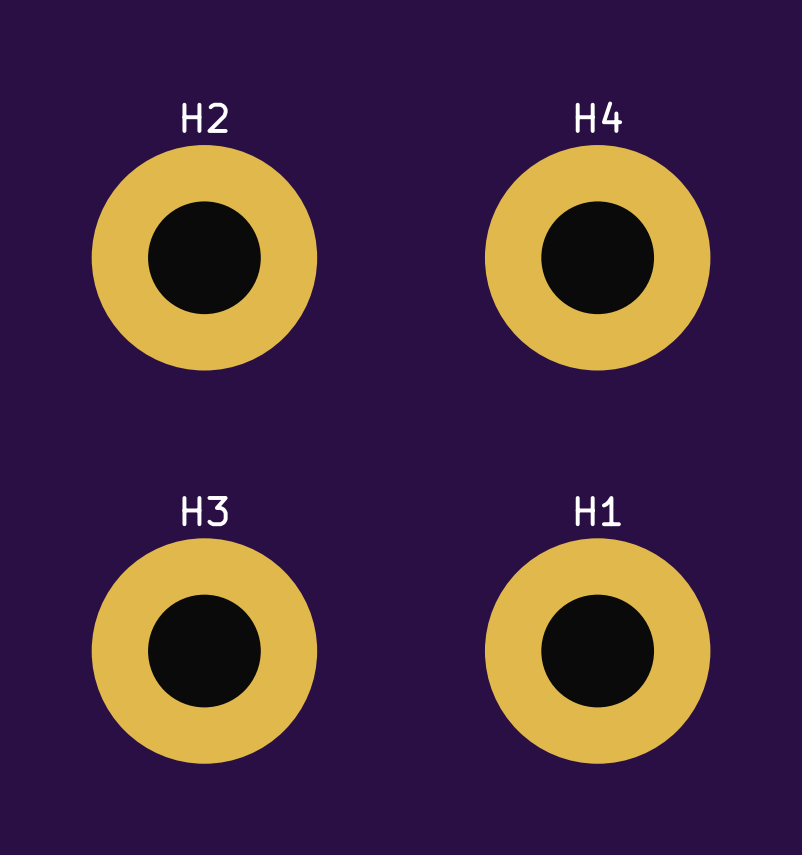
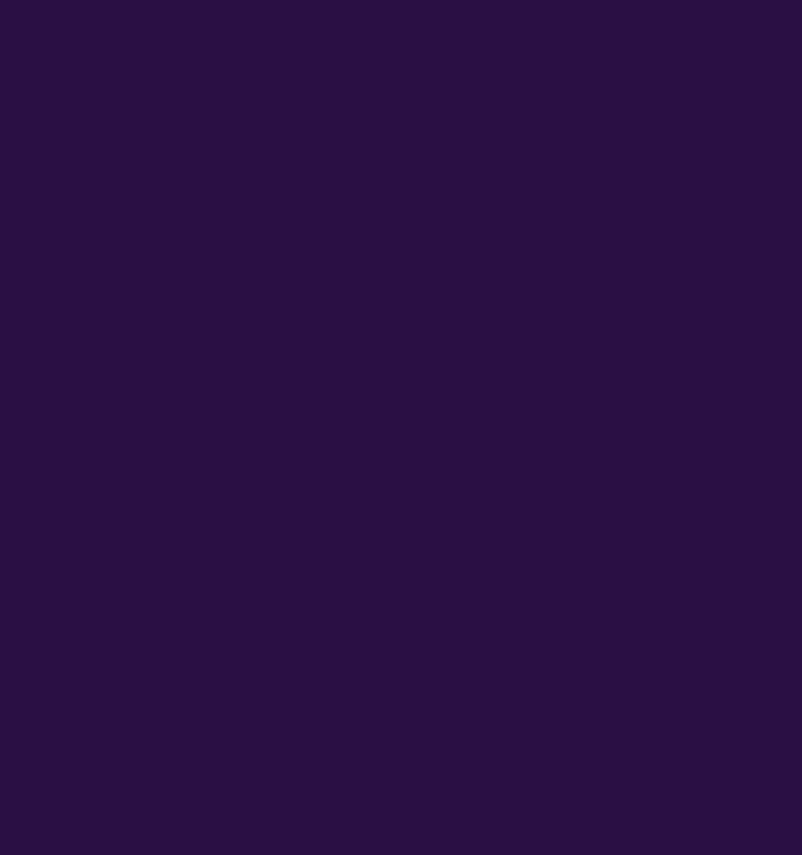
H2: (204, 257) -> none
H4: (597, 257) -> none
H3: (204, 651) -> none
H1: (597, 651) -> none

